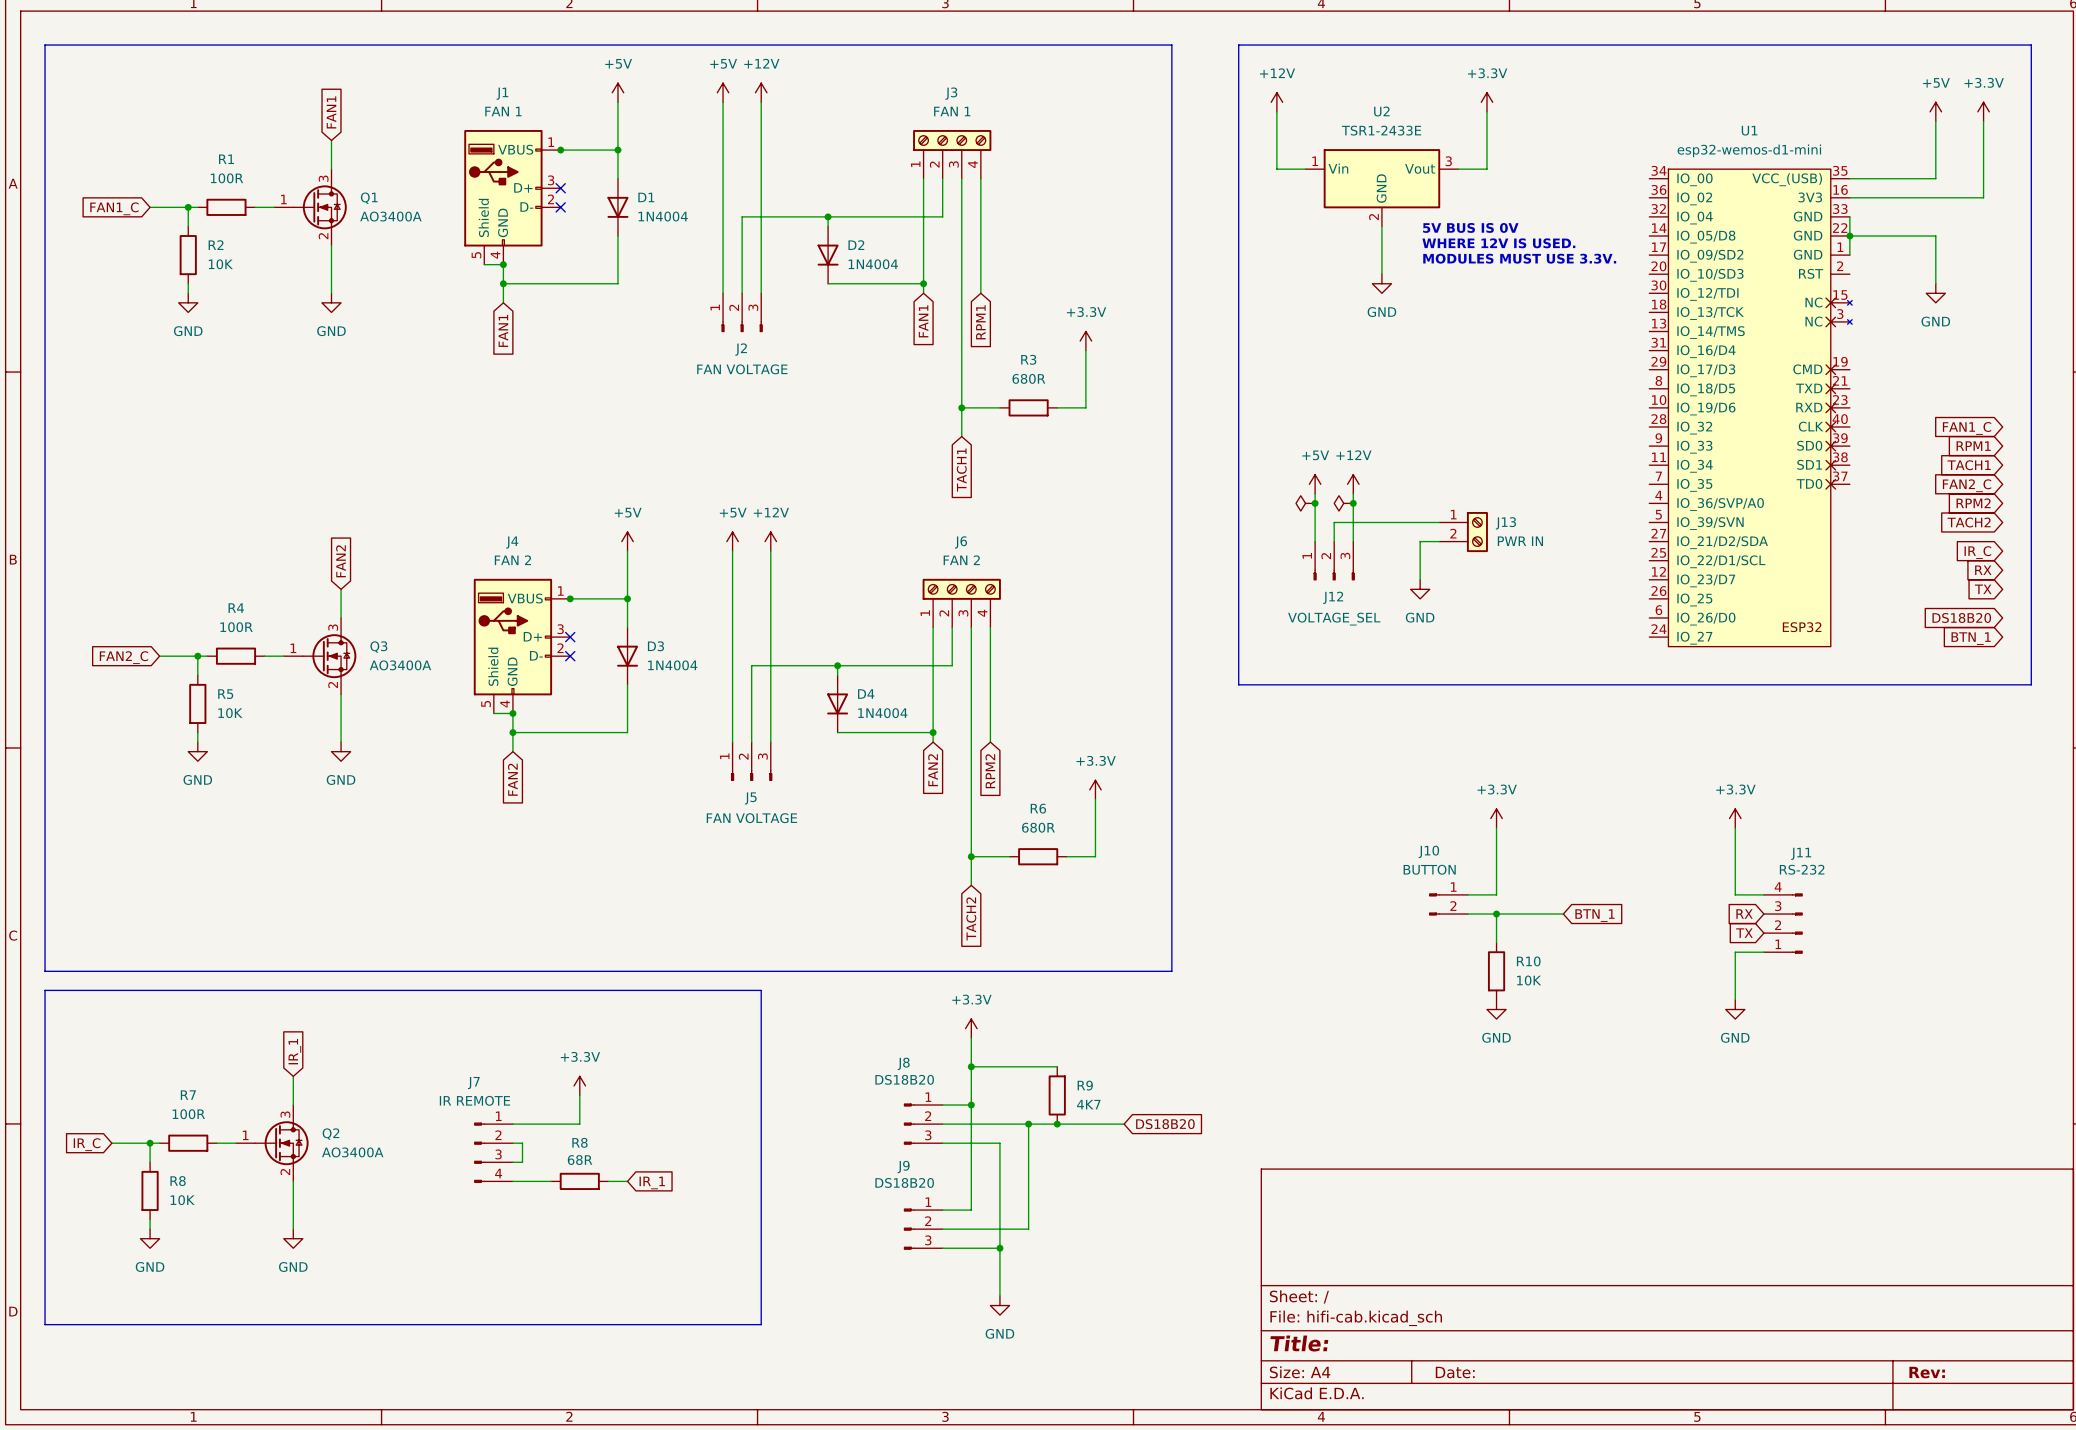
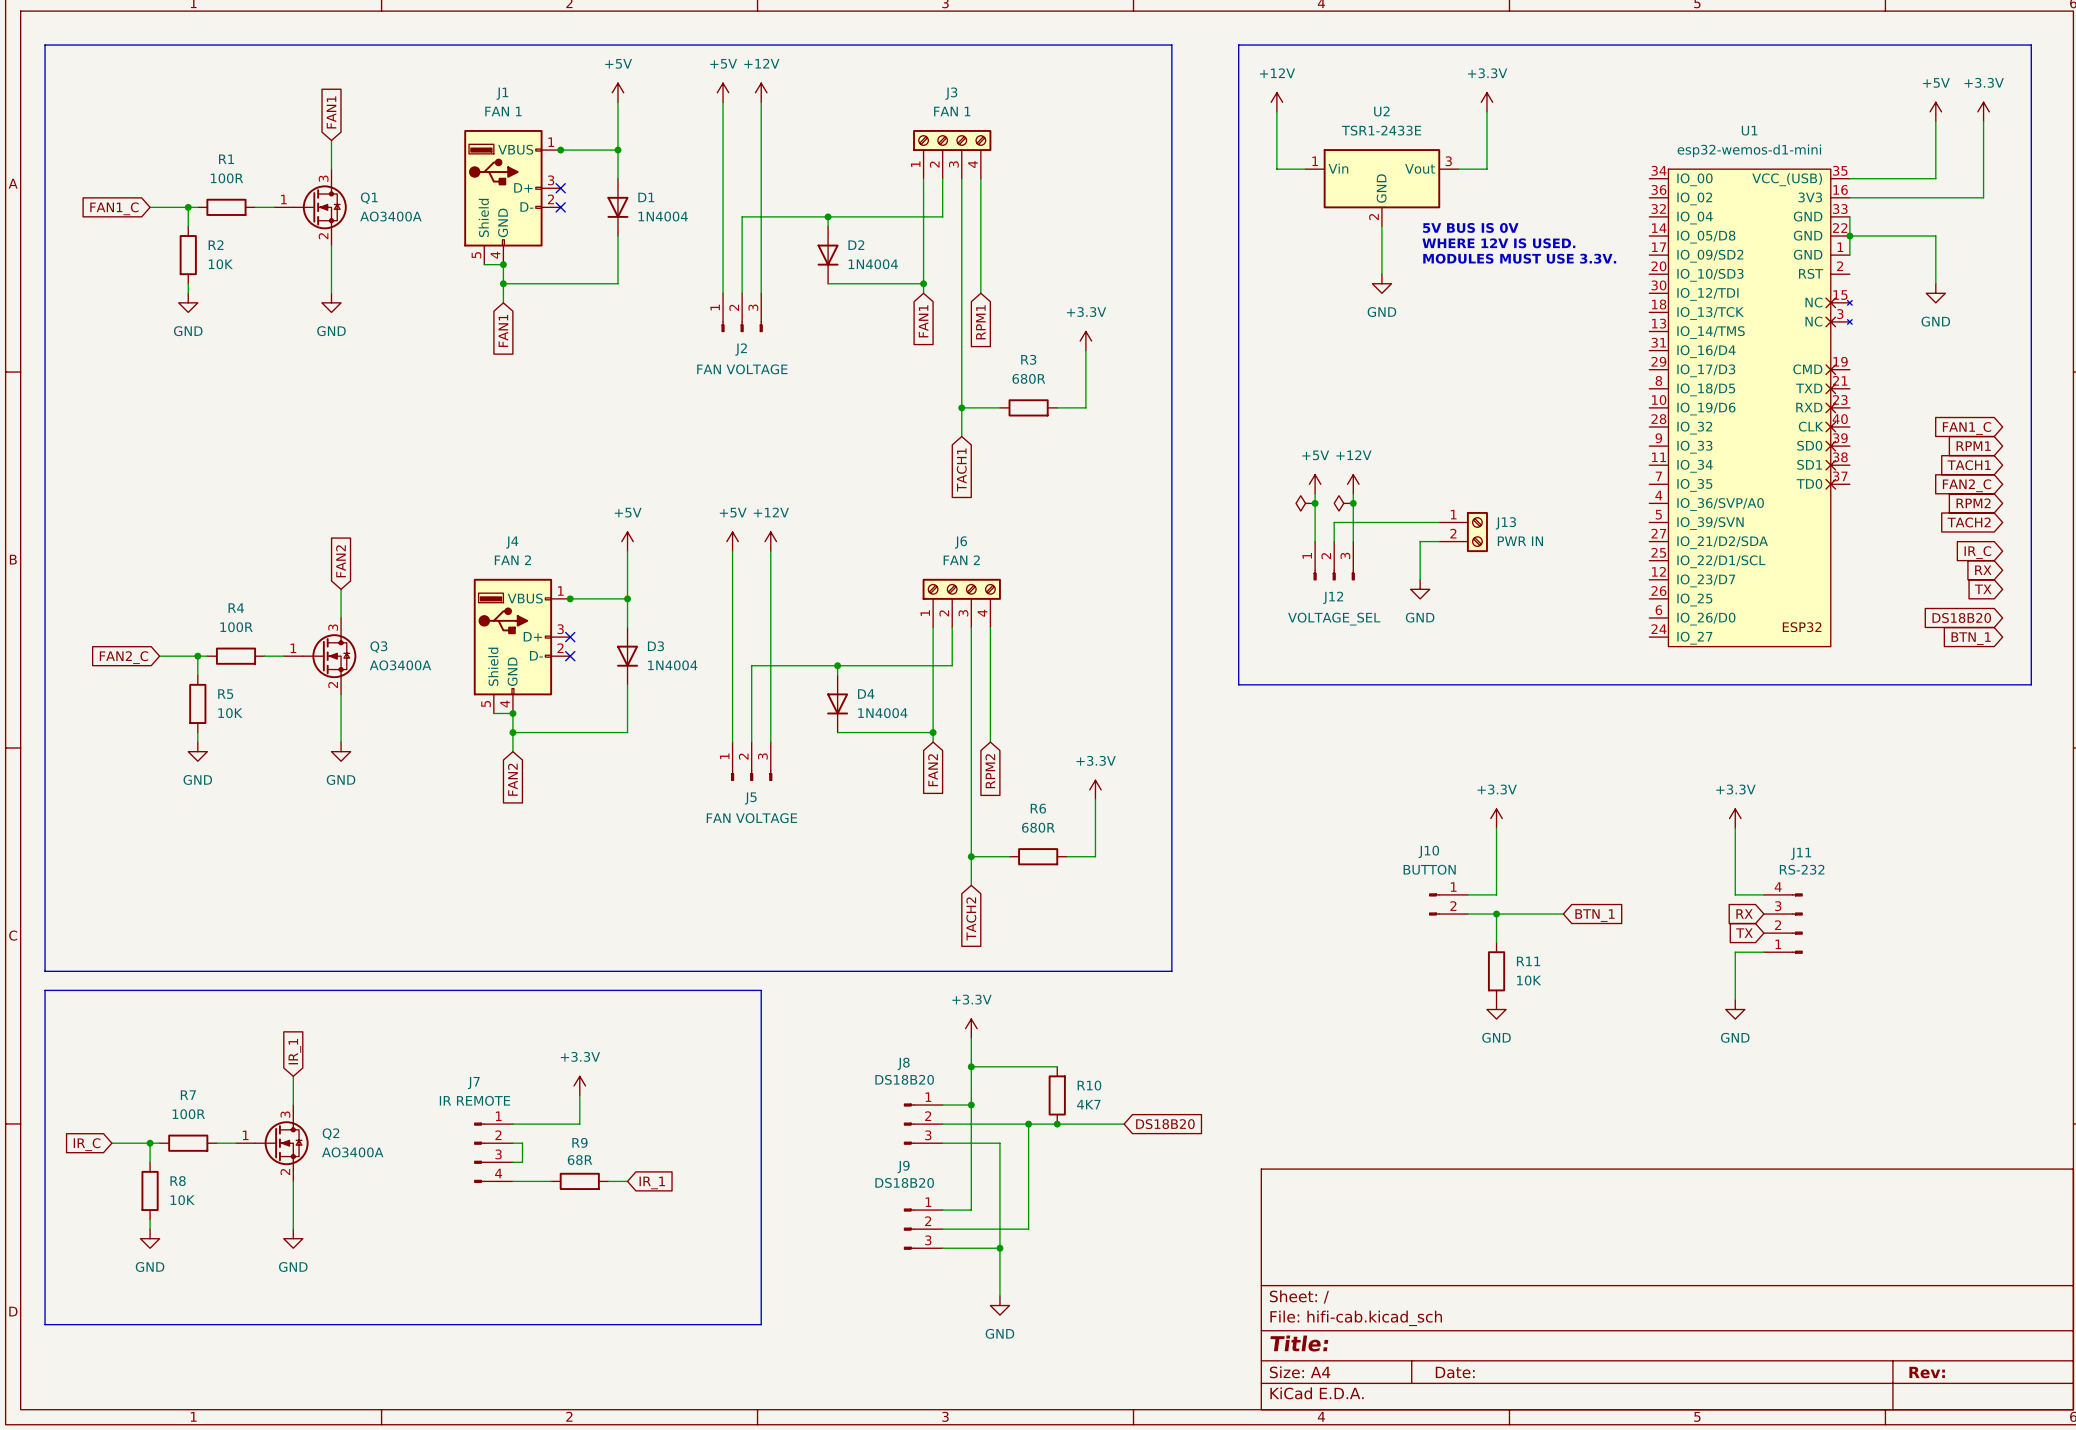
R10 name: R10 (1528, 961) -> R11 (1528, 961)
R9 name: R9 (1085, 1085) -> R10 (1089, 1085)
R8 name: R8 (579, 1142) -> R9 (579, 1142)

